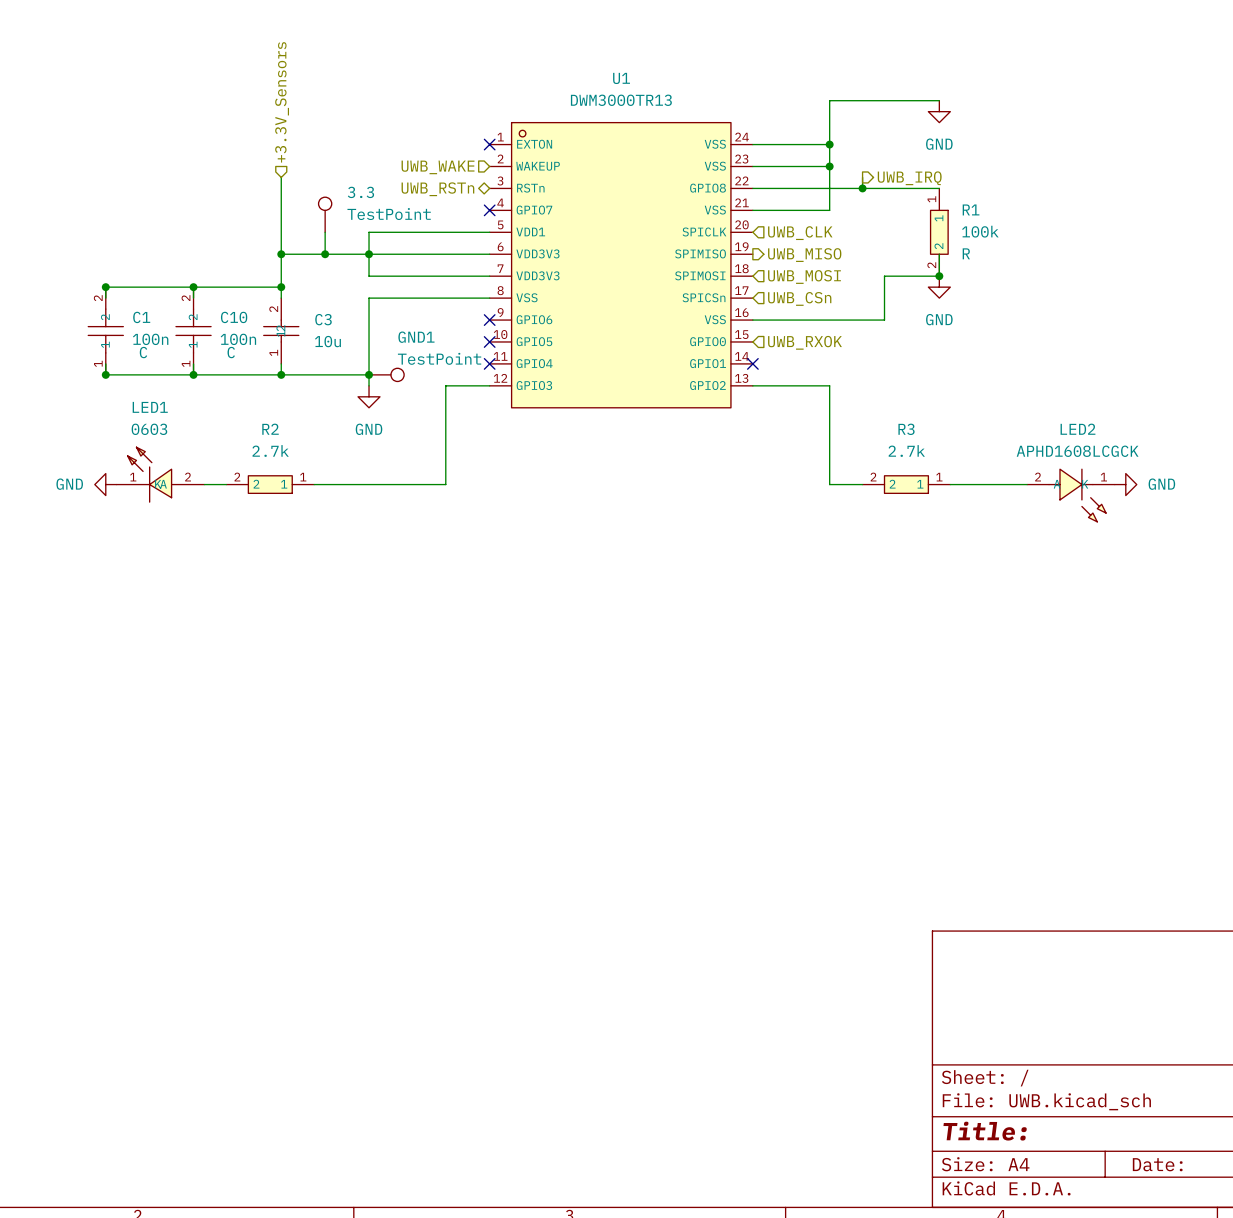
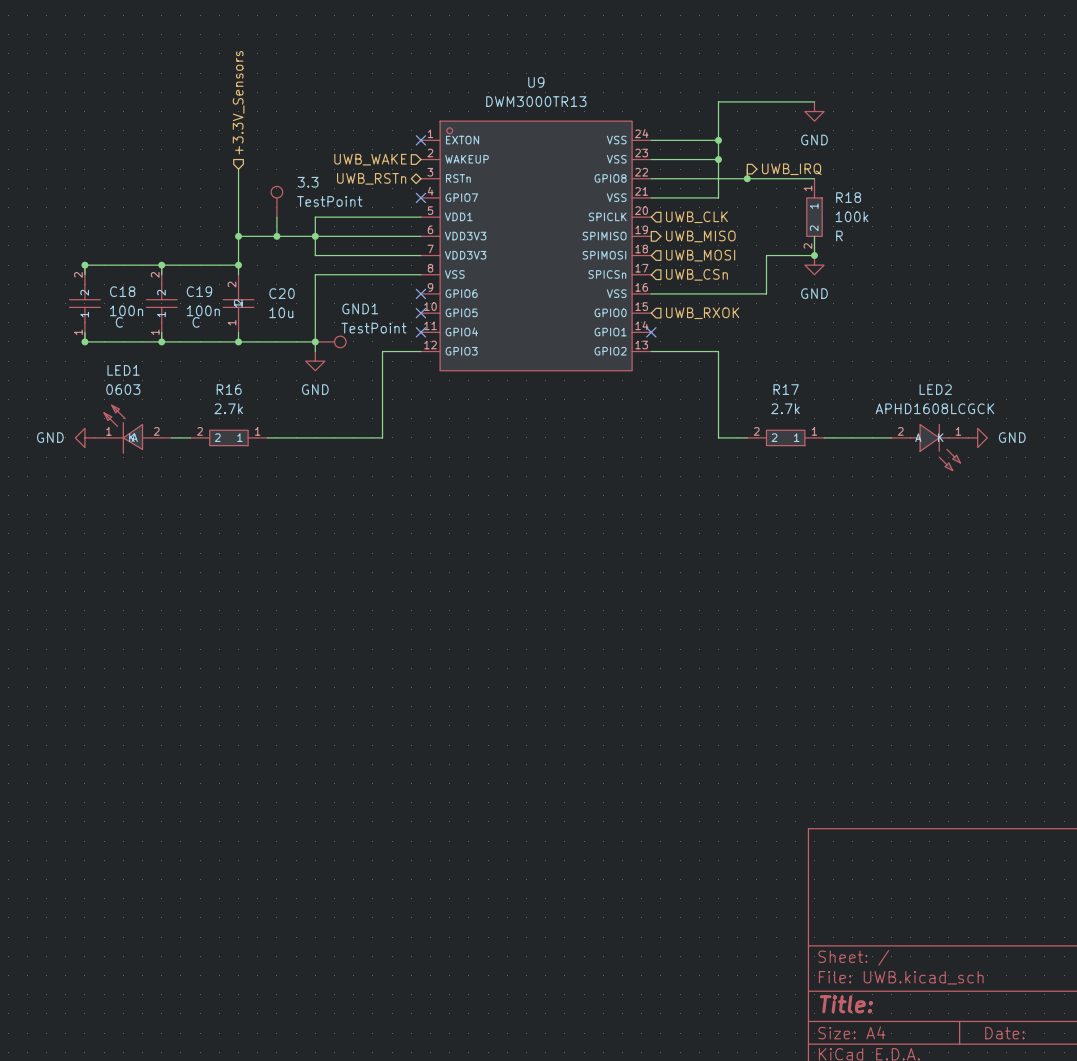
U1 name: U1 (621, 78) -> U9 (536, 82)
R1 name: R1 (971, 209) -> R18 (848, 197)
C1 name: C1 (141, 317) -> C18 (122, 291)
C10 name: C10 (234, 317) -> C19 (199, 291)
C3 name: C3 (323, 319) -> C20 (282, 293)
R2 name: R2 (270, 429) -> R16 (229, 389)
R3 name: R3 (906, 429) -> R17 (786, 389)

